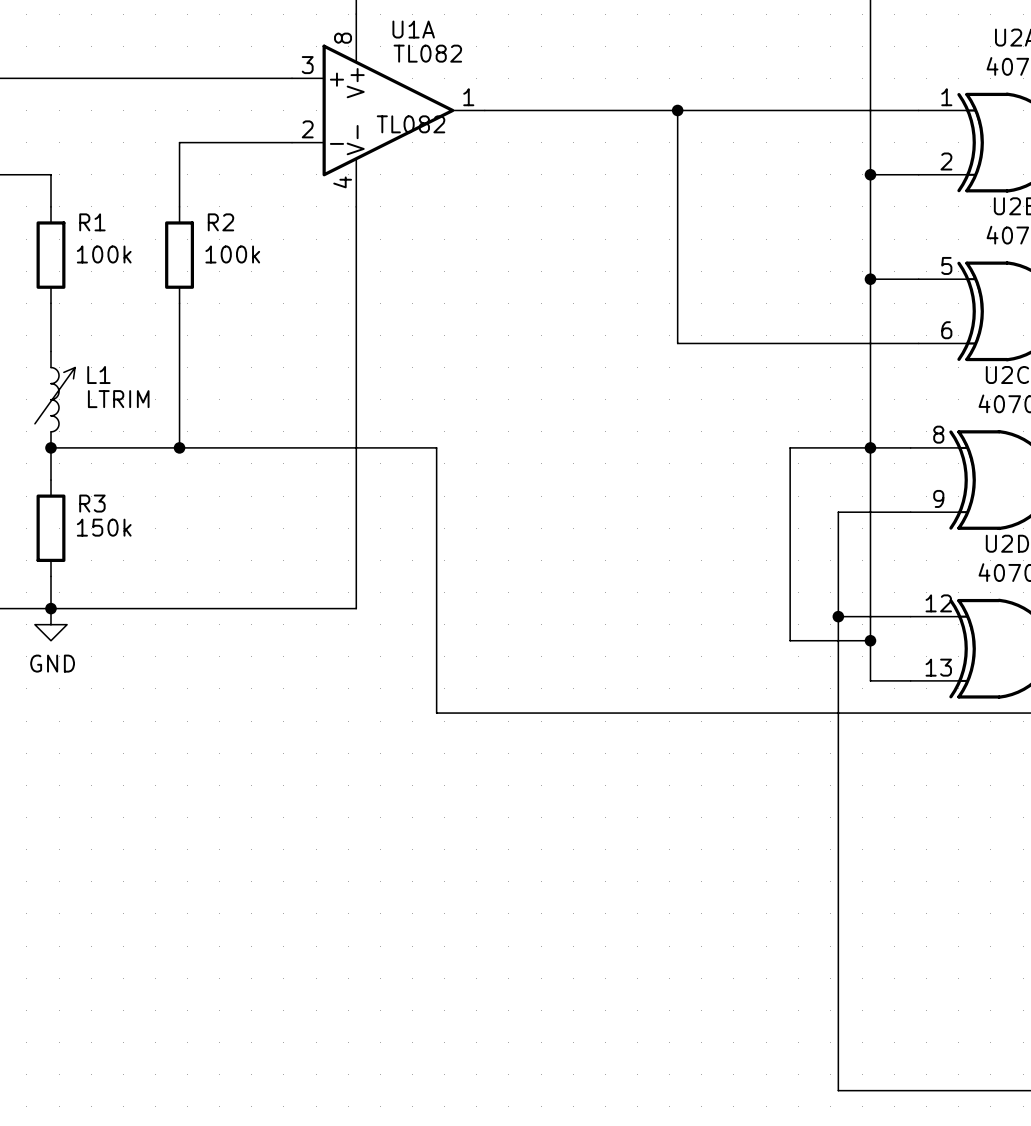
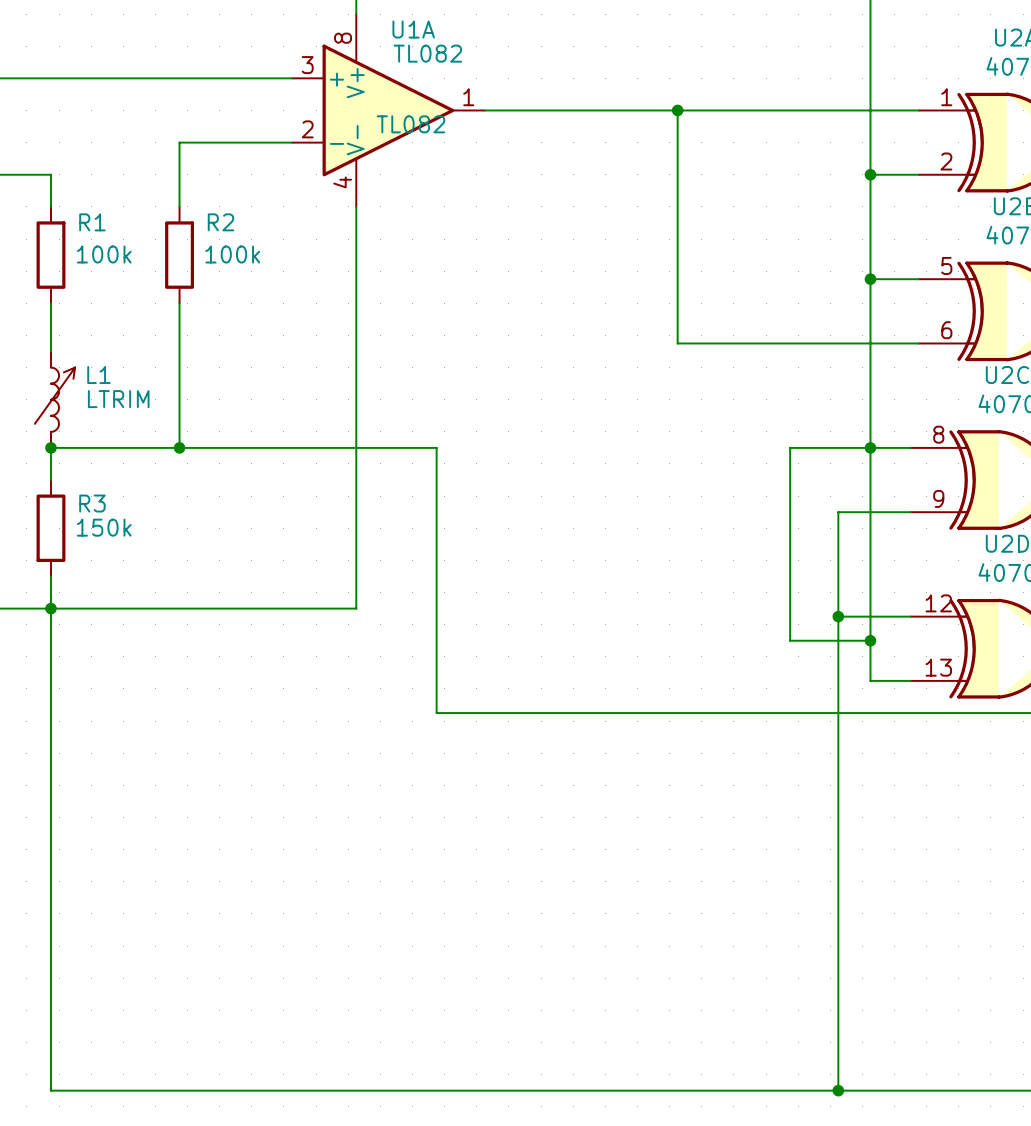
wire: none -> (50, 608) (50, 1090) (838, 1090)
power symbol: GND (50, 624) -> none
junction: none -> (838, 1090)

